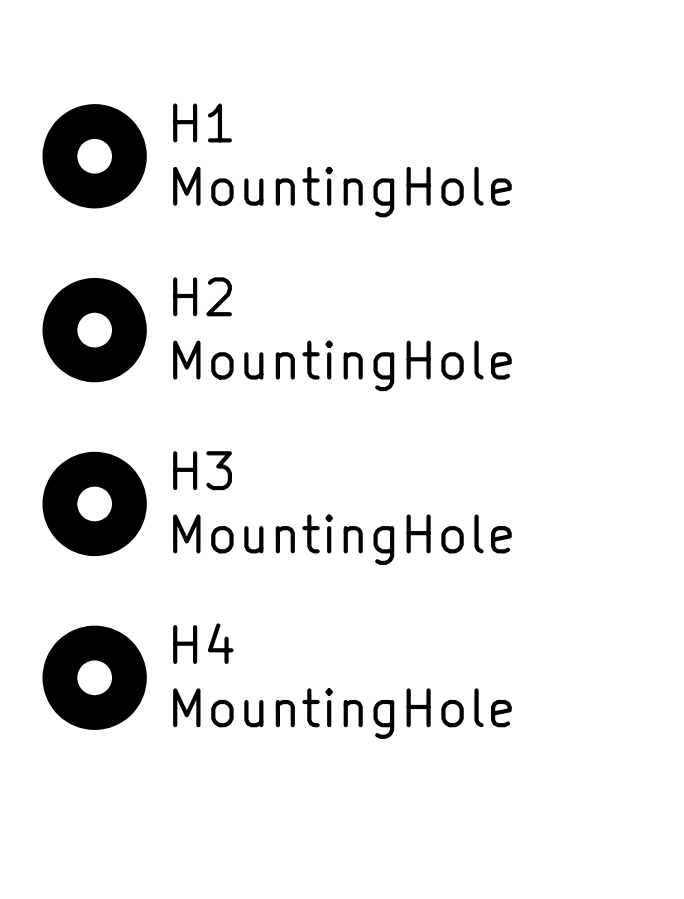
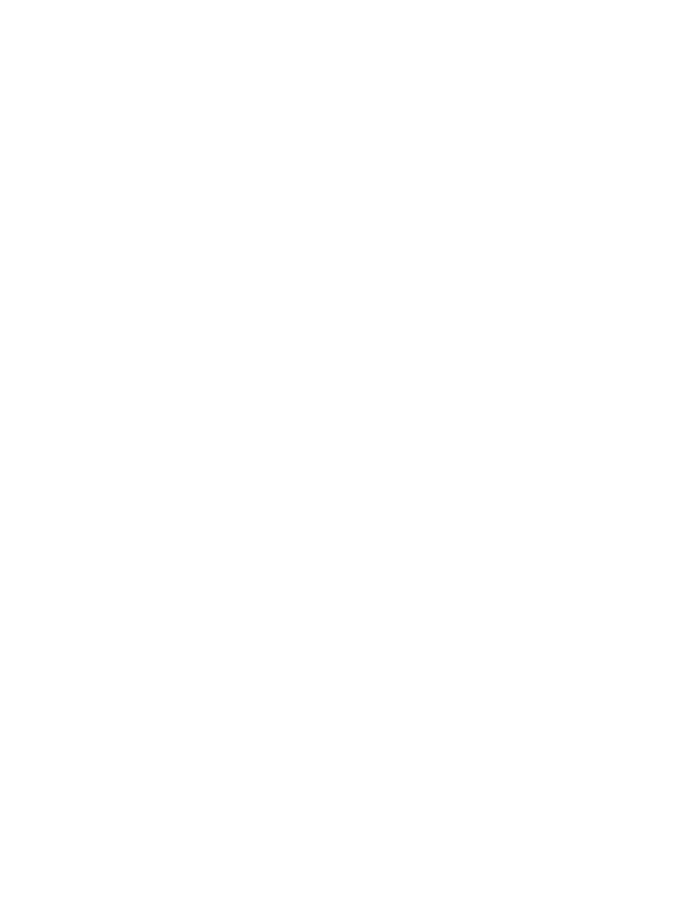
H1: MountingHole (94, 156) -> none
H2: MountingHole (94, 330) -> none
H3: MountingHole (94, 503) -> none
H4: MountingHole (94, 677) -> none

